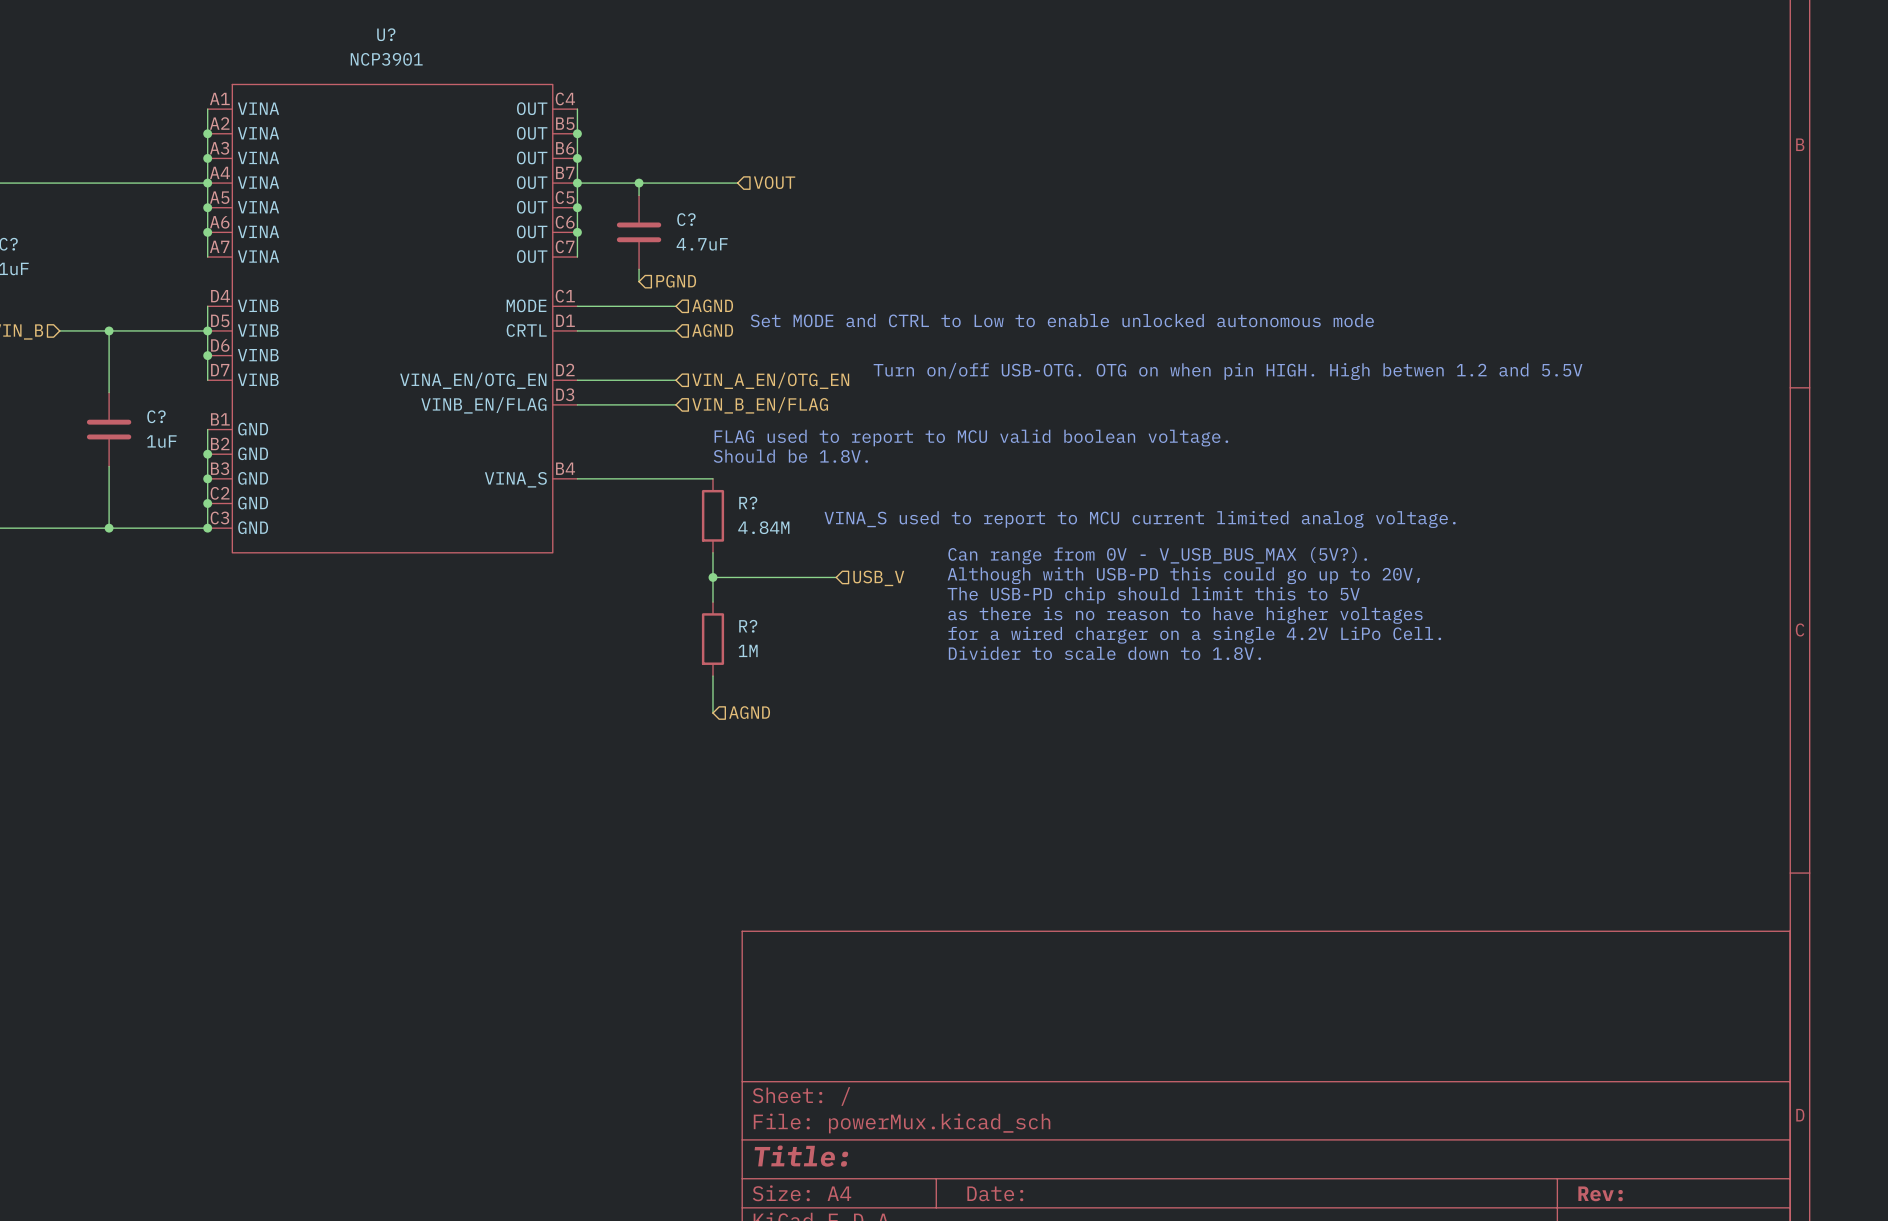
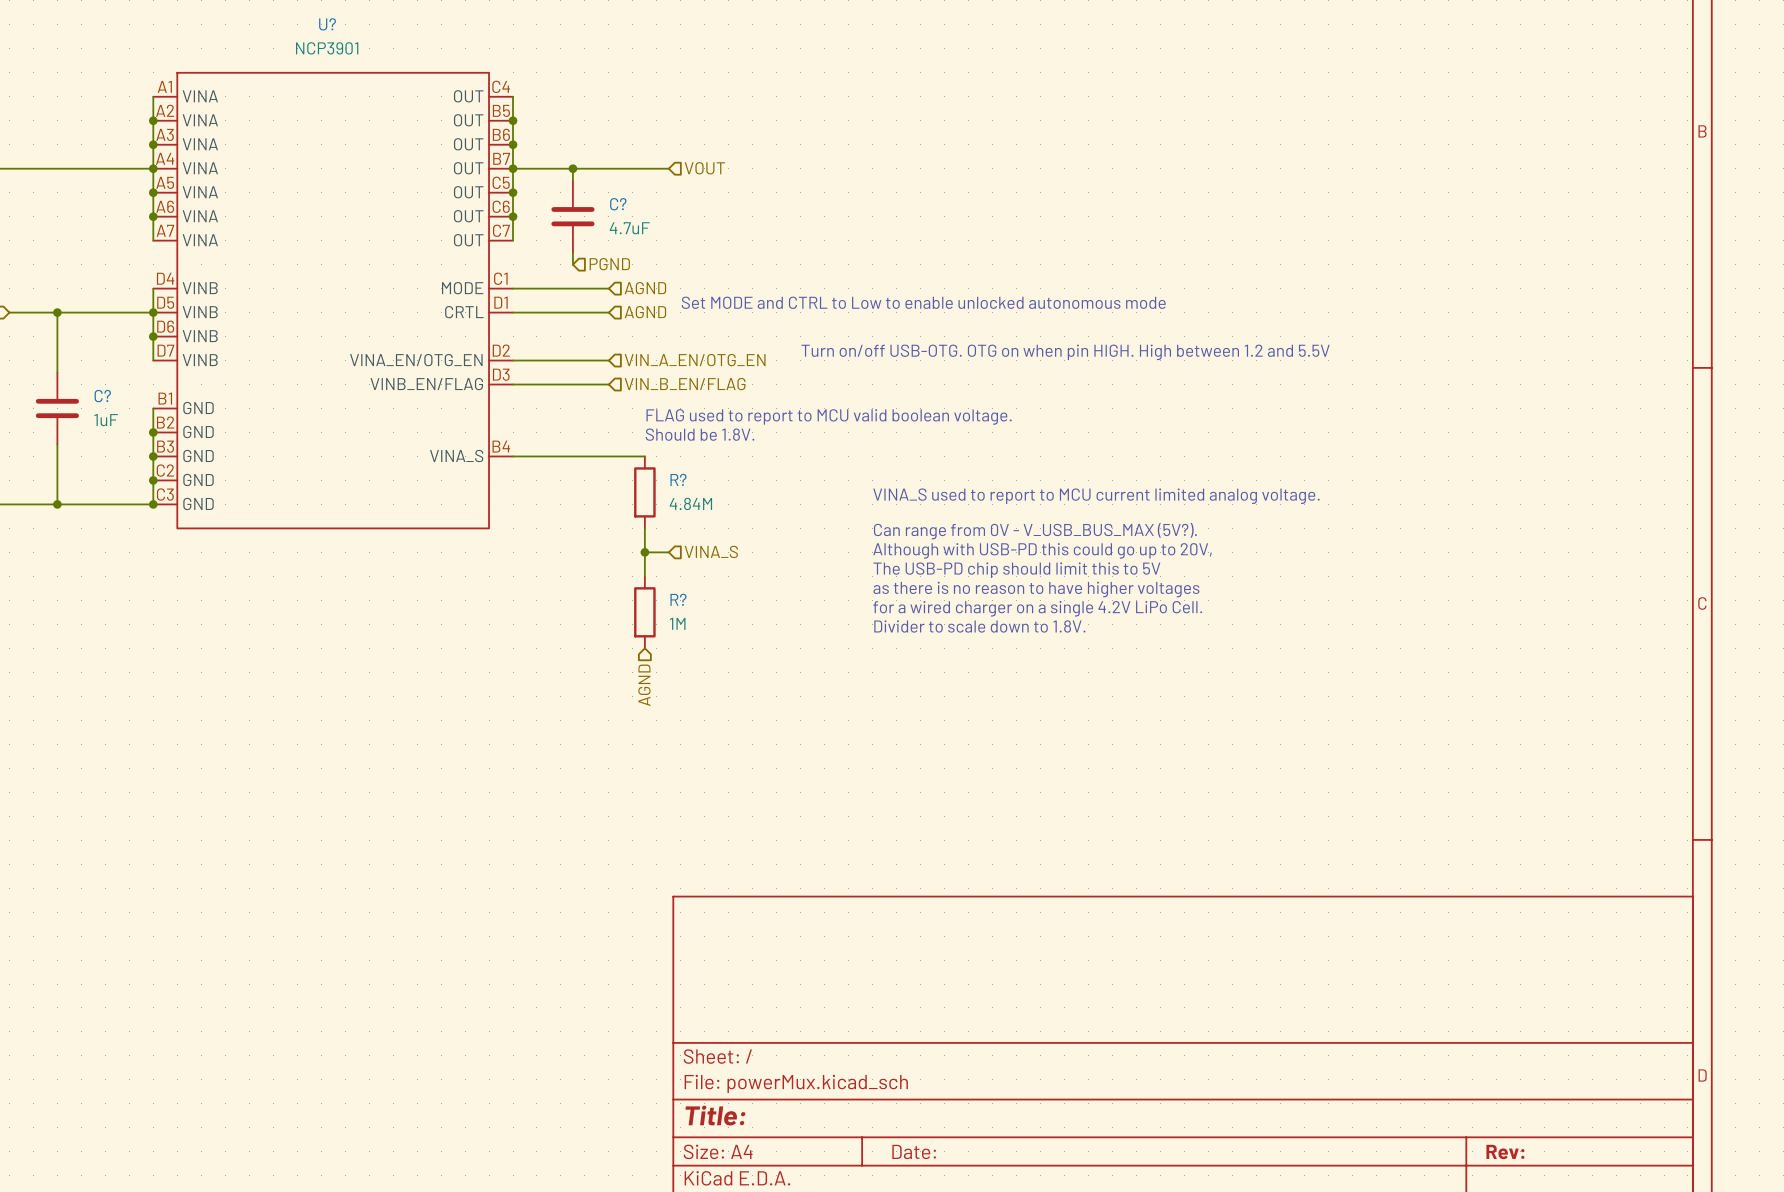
text: Turn on/off USB-OTG. OTG on when pin HIGH. High betwen 1.2 and 5.5V (1228, 371) -> Turn on/off USB-OTG. OTG on when pin HIGH. High between 1.2 and 5.5V (1065, 352)
text position: VINA_S used to report to MCU current limited analog voltage. (1140, 519) -> VINA_S used to report to MCU current limited analog voltage. (1096, 496)
wire: (737, 577) (836, 577) -> none
hierarchical label: none -> VINA_S (711, 551)
hierarchical label: USB_V (878, 578) -> none
wire: (712, 676) (712, 713) -> none
hierarchical label rotation: 0° (749, 712) -> 90° clockwise (644, 685)

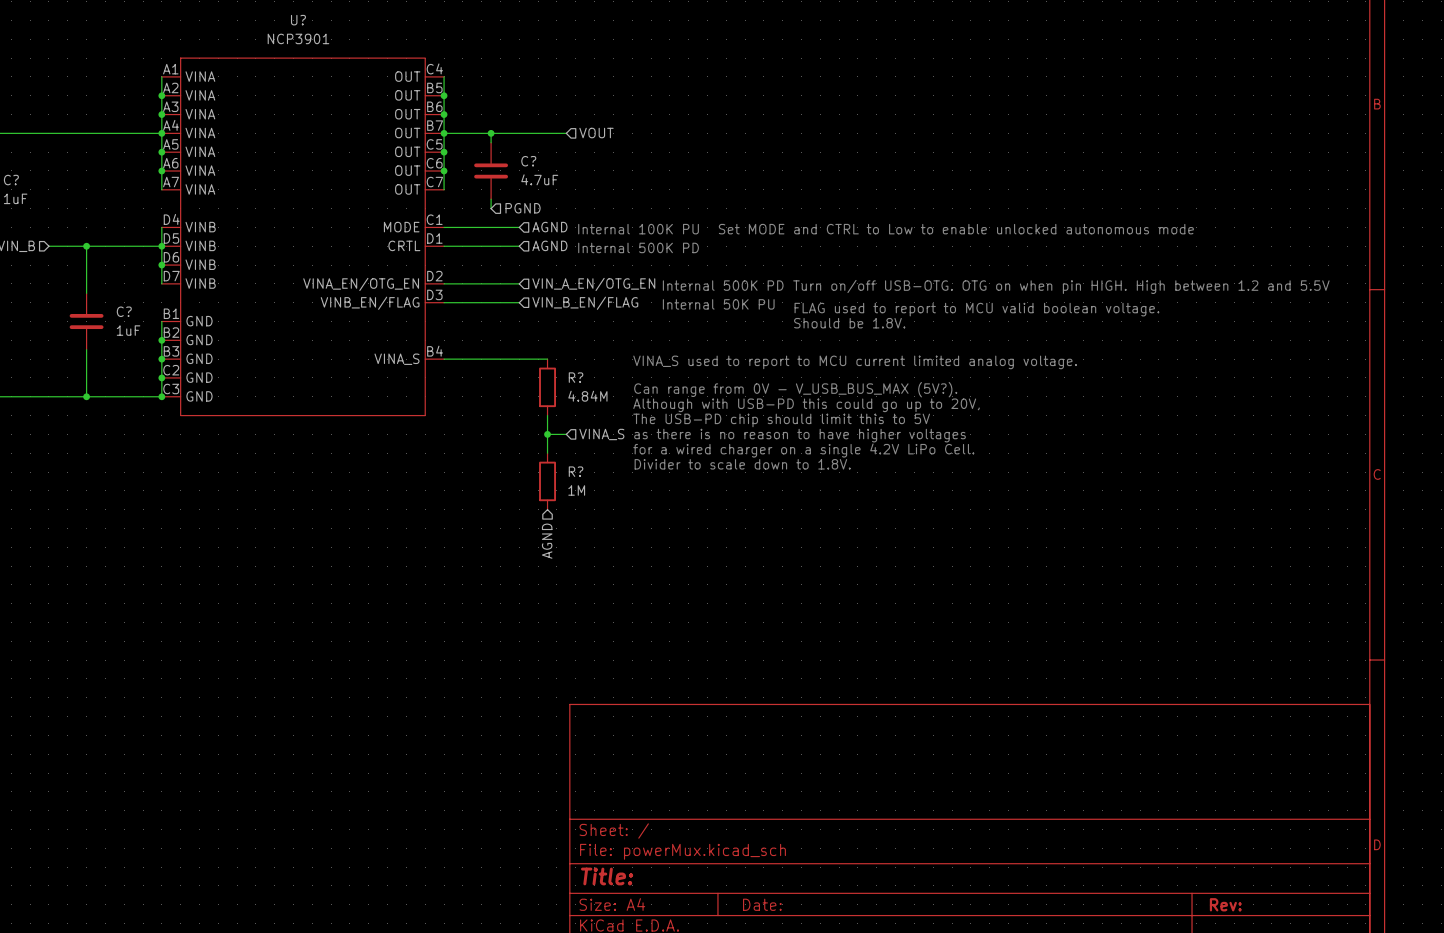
text: none -> Internal 100K PU (638, 229)
text position: Set MODE and CTRL to Low to enable unlocked autonomous mode (923, 302) -> Set MODE and CTRL to Low to enable unlocked autonomous mode (956, 229)
text: none -> Internal 500K PD (638, 247)
text position: Turn on/off USB-OTG. OTG on when pin HIGH. High between 1.2 and 5.5V (1065, 352) -> Turn on/off USB-OTG. OTG on when pin HIGH. High between 1.2 and 5.5V (1061, 286)
text: none -> Internal 500K PD (723, 285)
text: none -> Internal 50K PU (718, 304)
text: none -> FLAG used to report to MCU valid boolean voltage. (976, 309)
text: none -> Should be 1.8V. (849, 323)
text: FLAG used to report to MCU valid boolean voltage. (829, 416) -> none
text: Should be 1.8V. (700, 434) -> none
text position: VINA_S used to report to MCU current limited analog voltage. (1096, 496) -> VINA_S used to report to MCU current limited analog voltage. (855, 362)
text position: Can range from 0V - V_USB_BUS_MAX (5V?). (1035, 531) -> Can range from 0V - V_USB_BUS_MAX (5V?). (795, 389)
text position: Although with USB-PD this could go up to 20V, (1042, 550) -> Although with USB-PD this could go up to 20V, (806, 405)
text position: The USB-PD chip should limit this to 5V (1016, 570) -> The USB-PD chip should limit this to 5V (781, 420)
text position: as there is no reason to have higher voltages (1036, 589) -> as there is no reason to have higher voltages (800, 435)
text position: for a wired charger on a single 4.2V LiPo Cell. (1037, 608) -> for a wired charger on a single 4.2V LiPo Cell. (803, 450)
text position: Divider to scale down to 1.8V. (979, 626) -> Divider to scale down to 1.8V. (742, 464)

